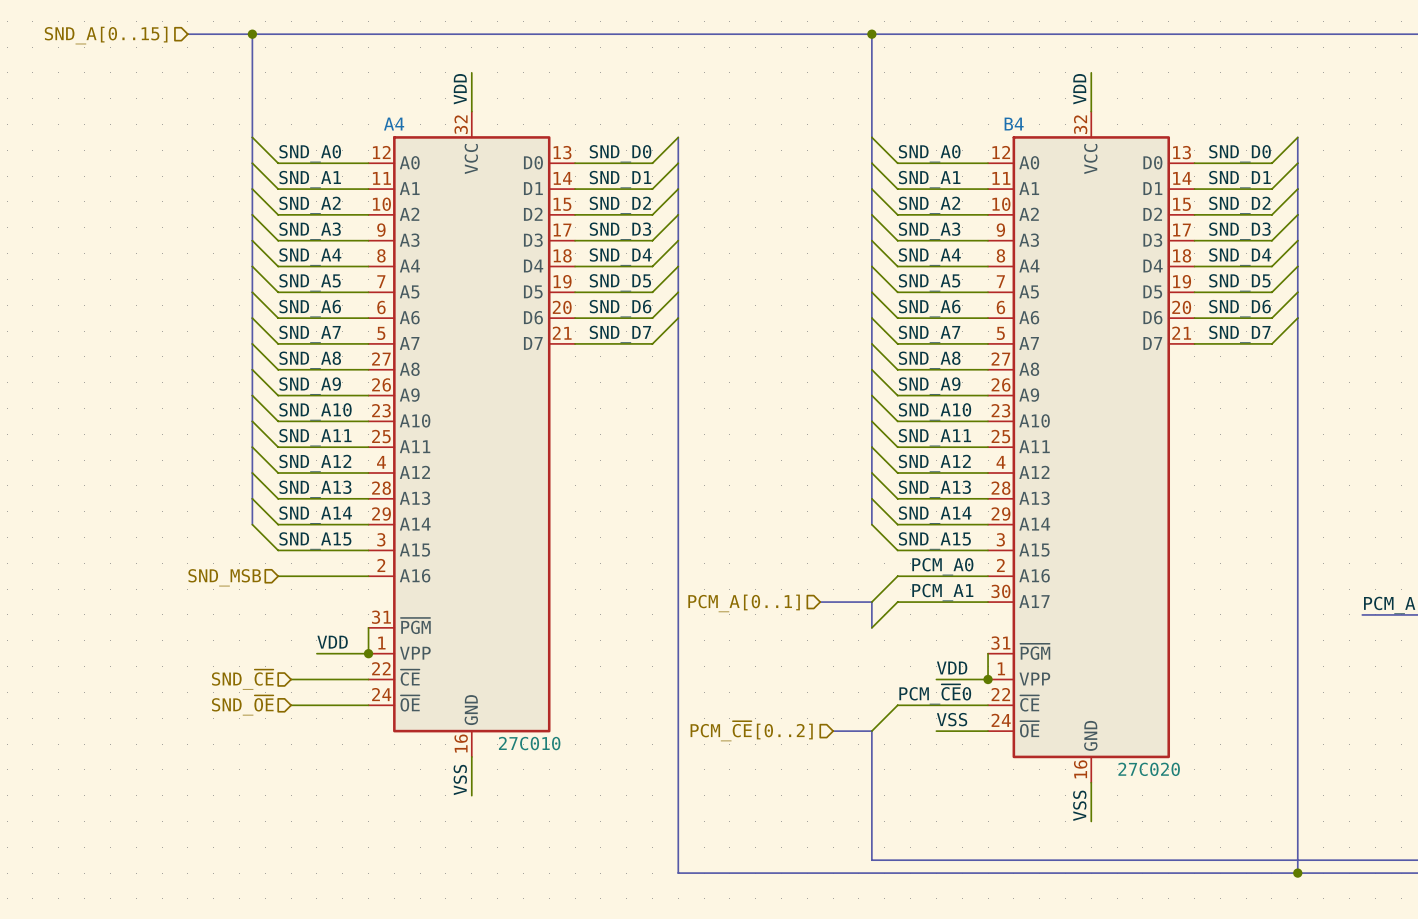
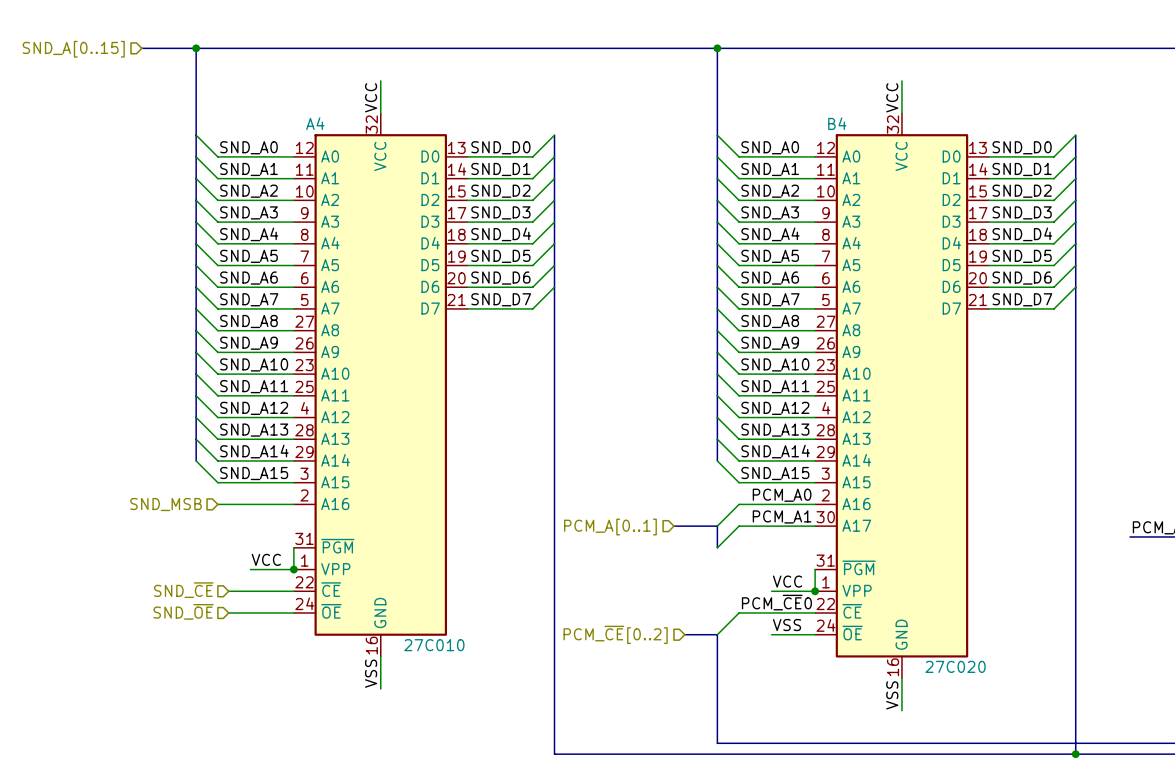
label: VDD (460, 89) -> VCC (371, 97)
label: VDD (1079, 89) -> VCC (892, 97)
label: VDD (332, 642) -> VCC (266, 559)
label: VDD (952, 667) -> VCC (787, 581)

